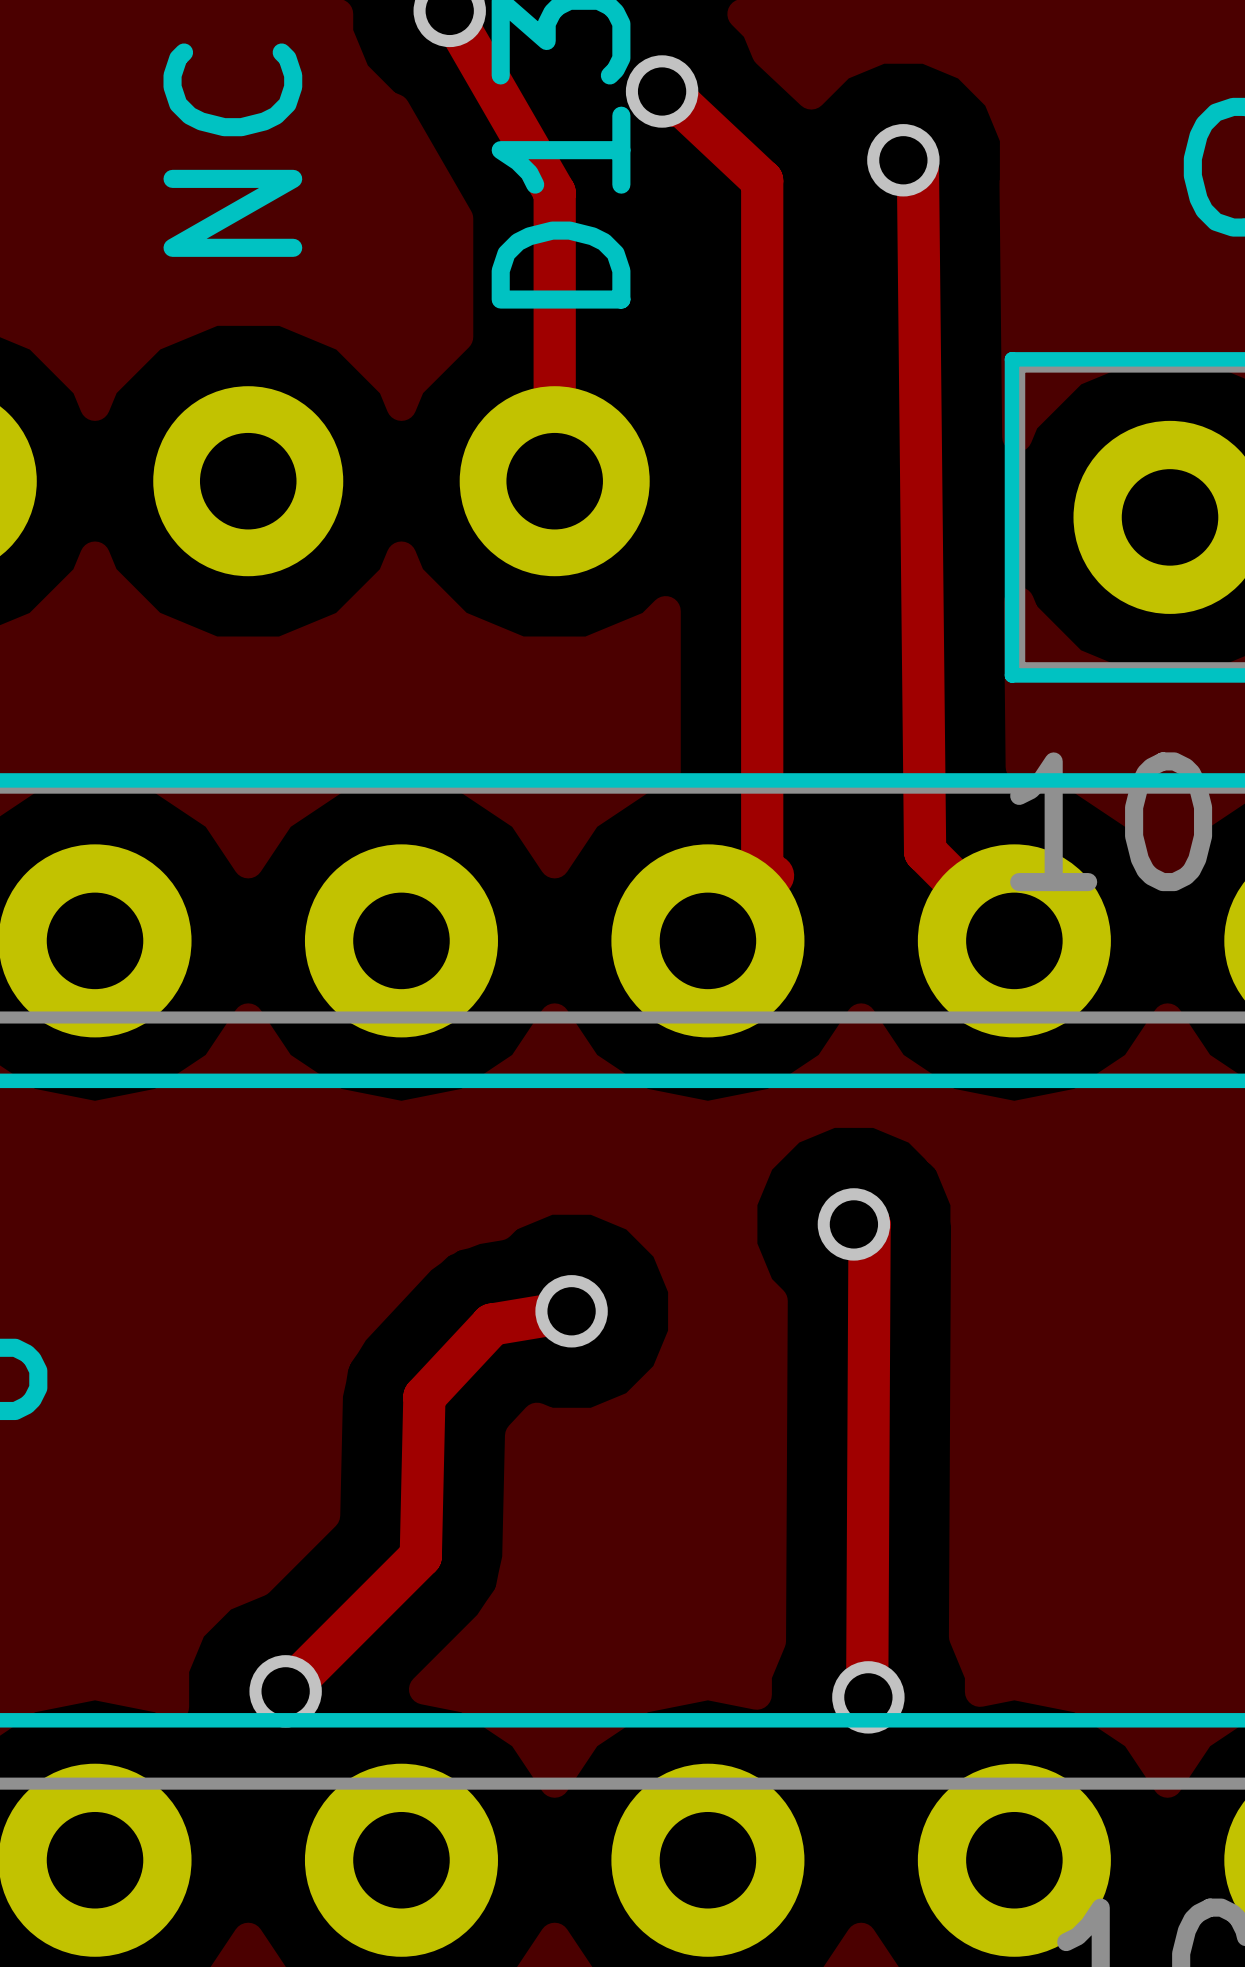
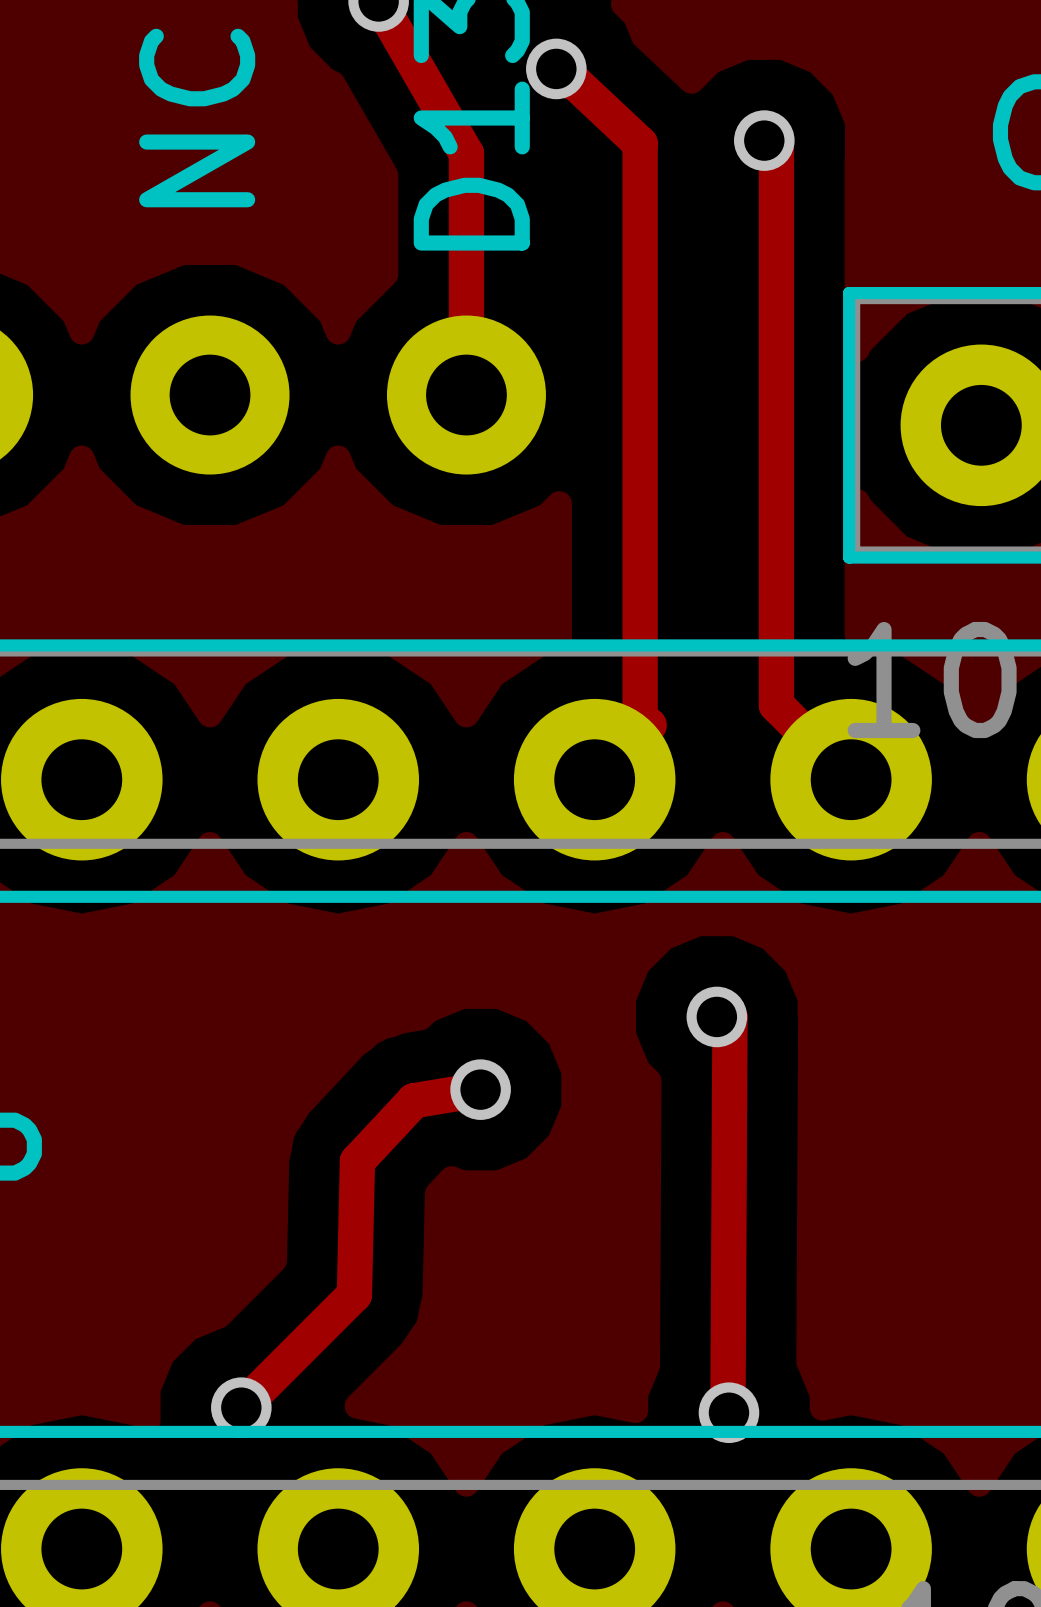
track: (903, 160) (917, 162) (925, 851) -> (764, 140) (776, 142) (776, 704)
via position: (903, 160) -> (764, 140)

